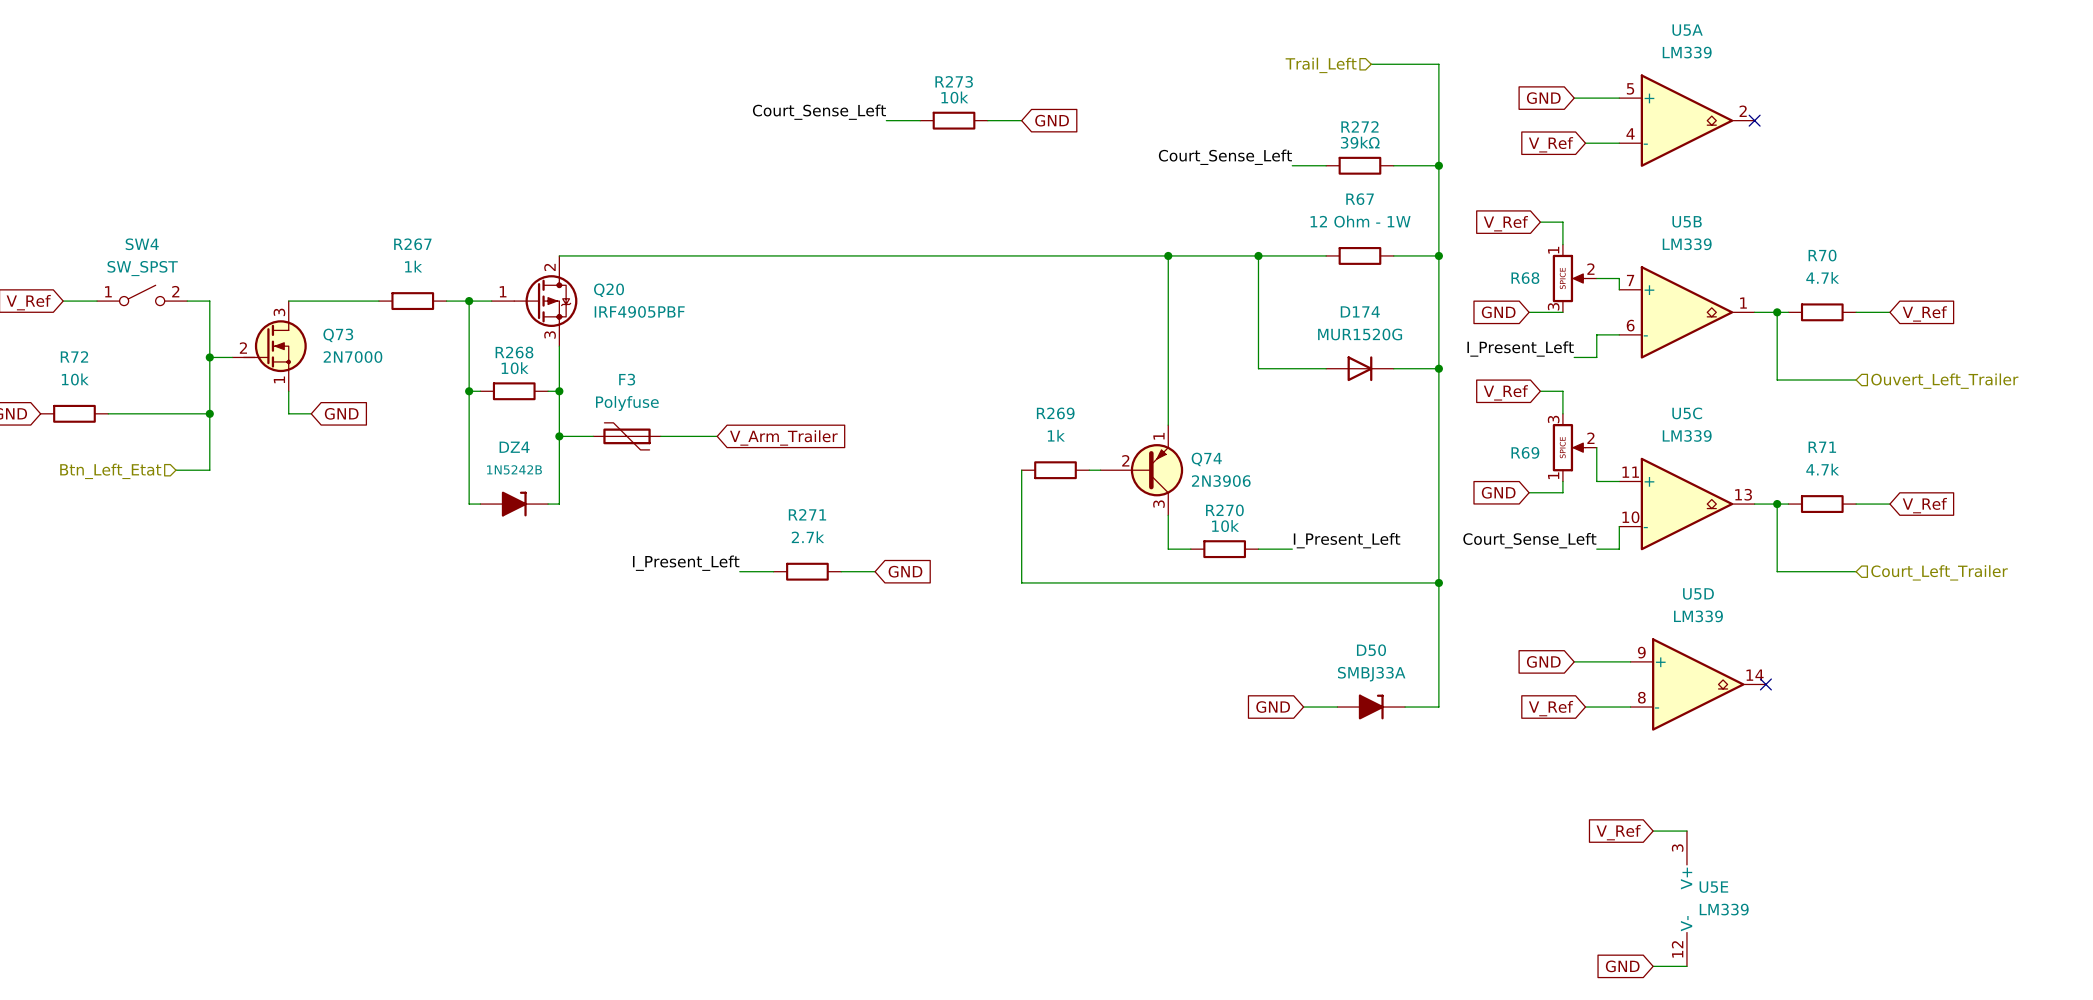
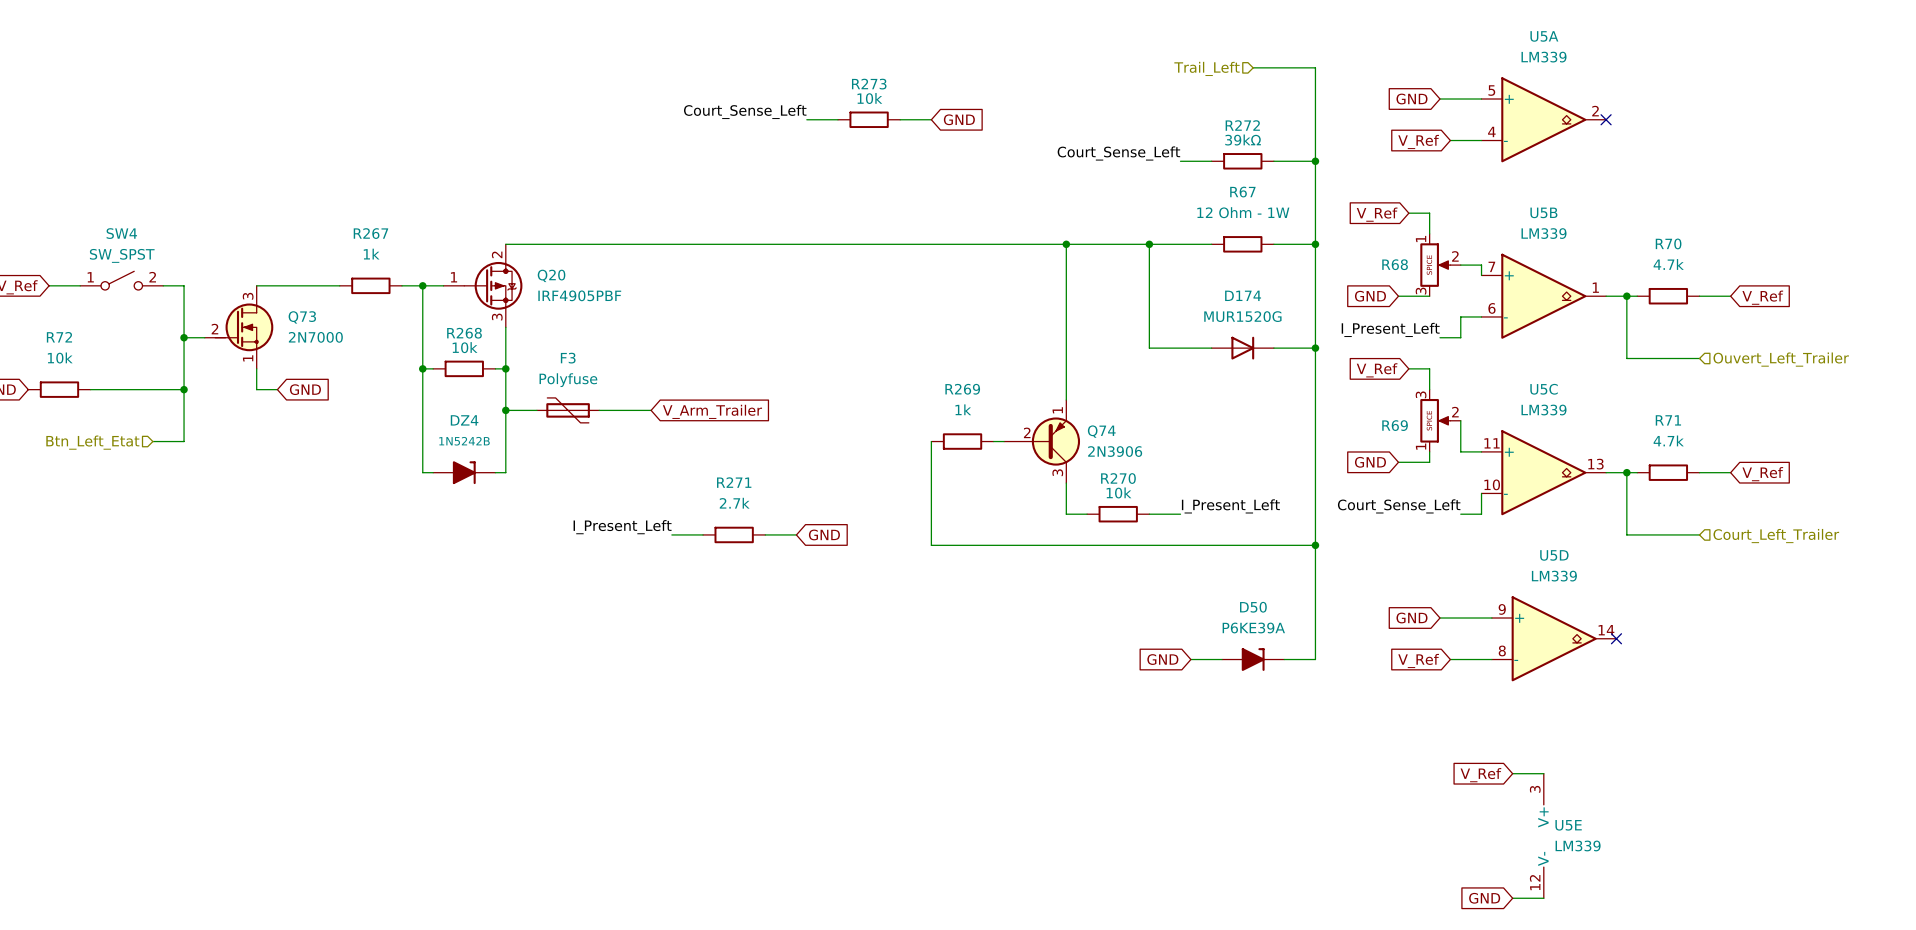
D50 value: SMBJ33A (1371, 674) -> P6KE39A (1253, 628)

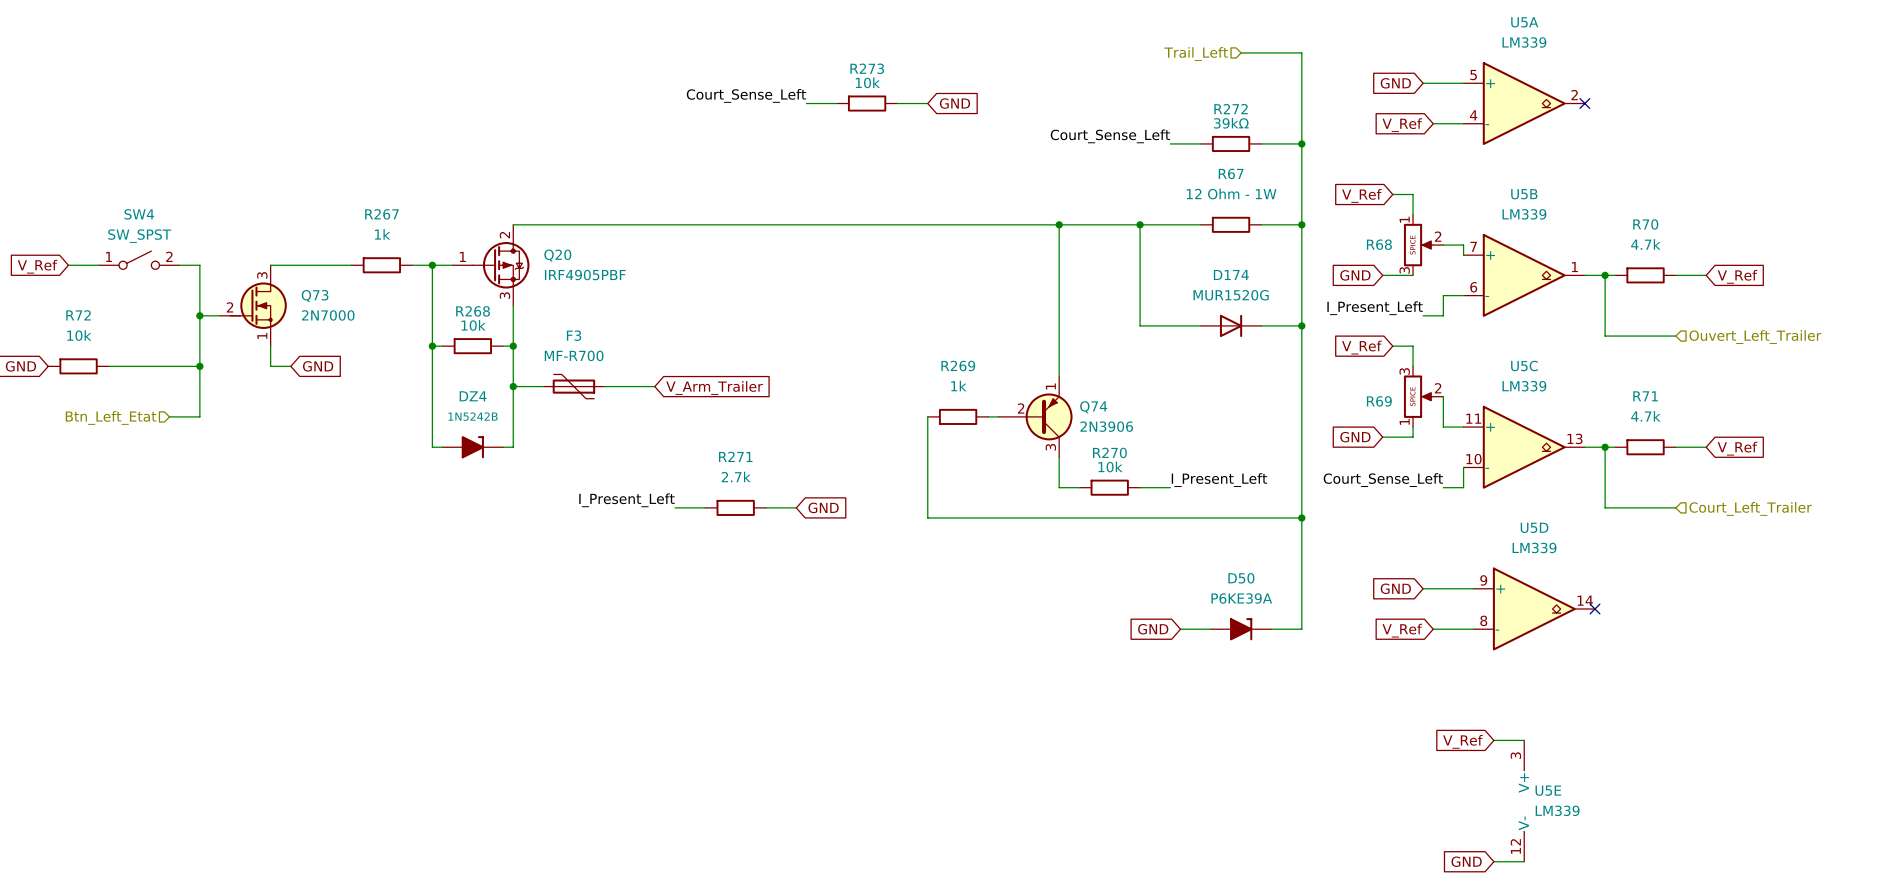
F3 value: Polyfuse (568, 380) -> MF-R700 (574, 355)

